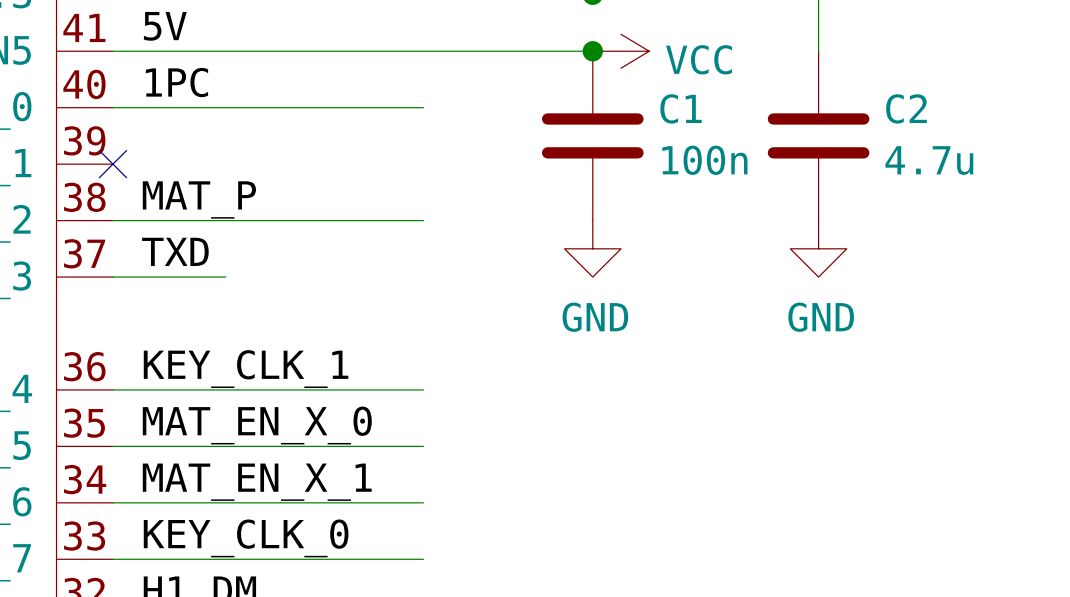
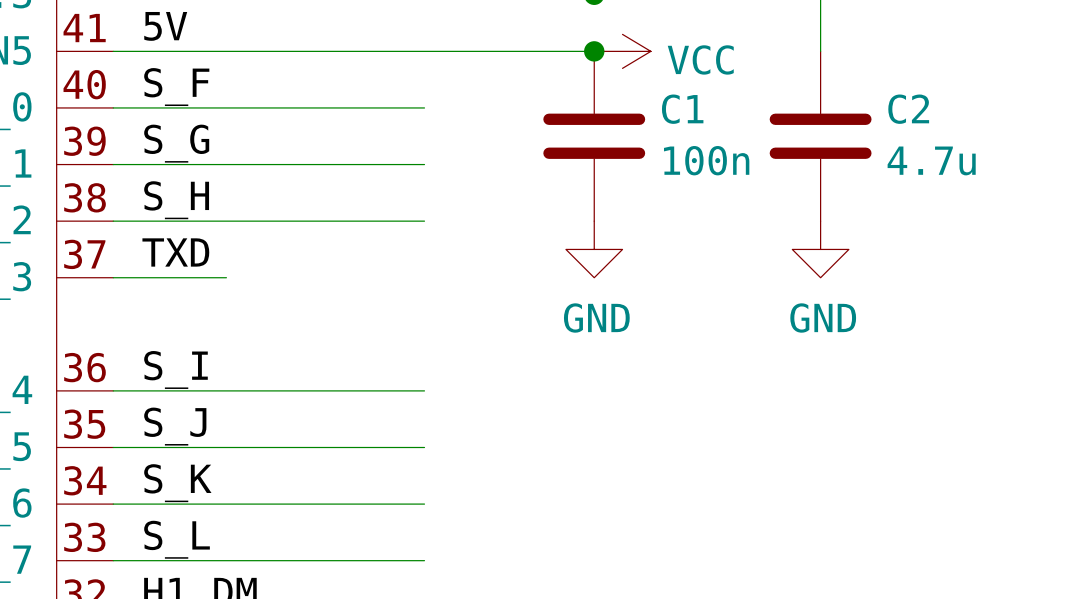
label: 1PC (176, 82) -> S_F (176, 87)
label: none -> S_G (176, 143)
wire: none -> (113, 164) (424, 164)
no-connect mark: (112, 164) -> none
label: MAT_P (199, 199) -> S_H (176, 200)
label: KEY_CLK_1 (246, 369) -> S_I (175, 369)
label: MAT_EN_X_0 (257, 425) -> S_J (175, 426)
label: MAT_EN_X_1 (257, 482) -> S_K (177, 483)
label: KEY_CLK_0 (246, 538) -> S_L (177, 539)

